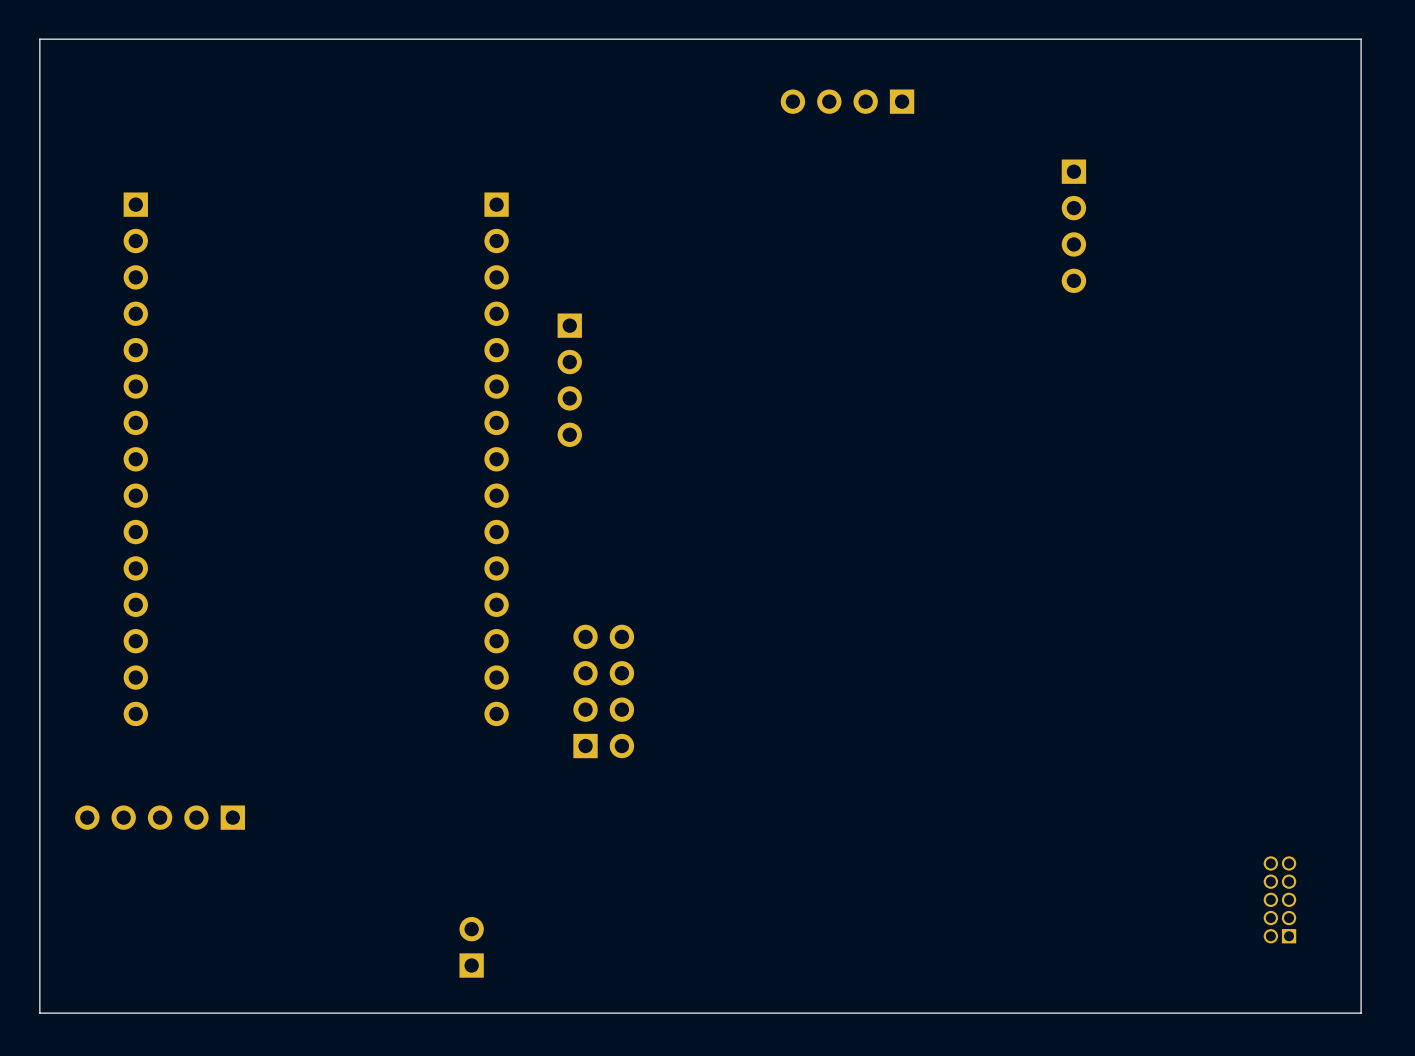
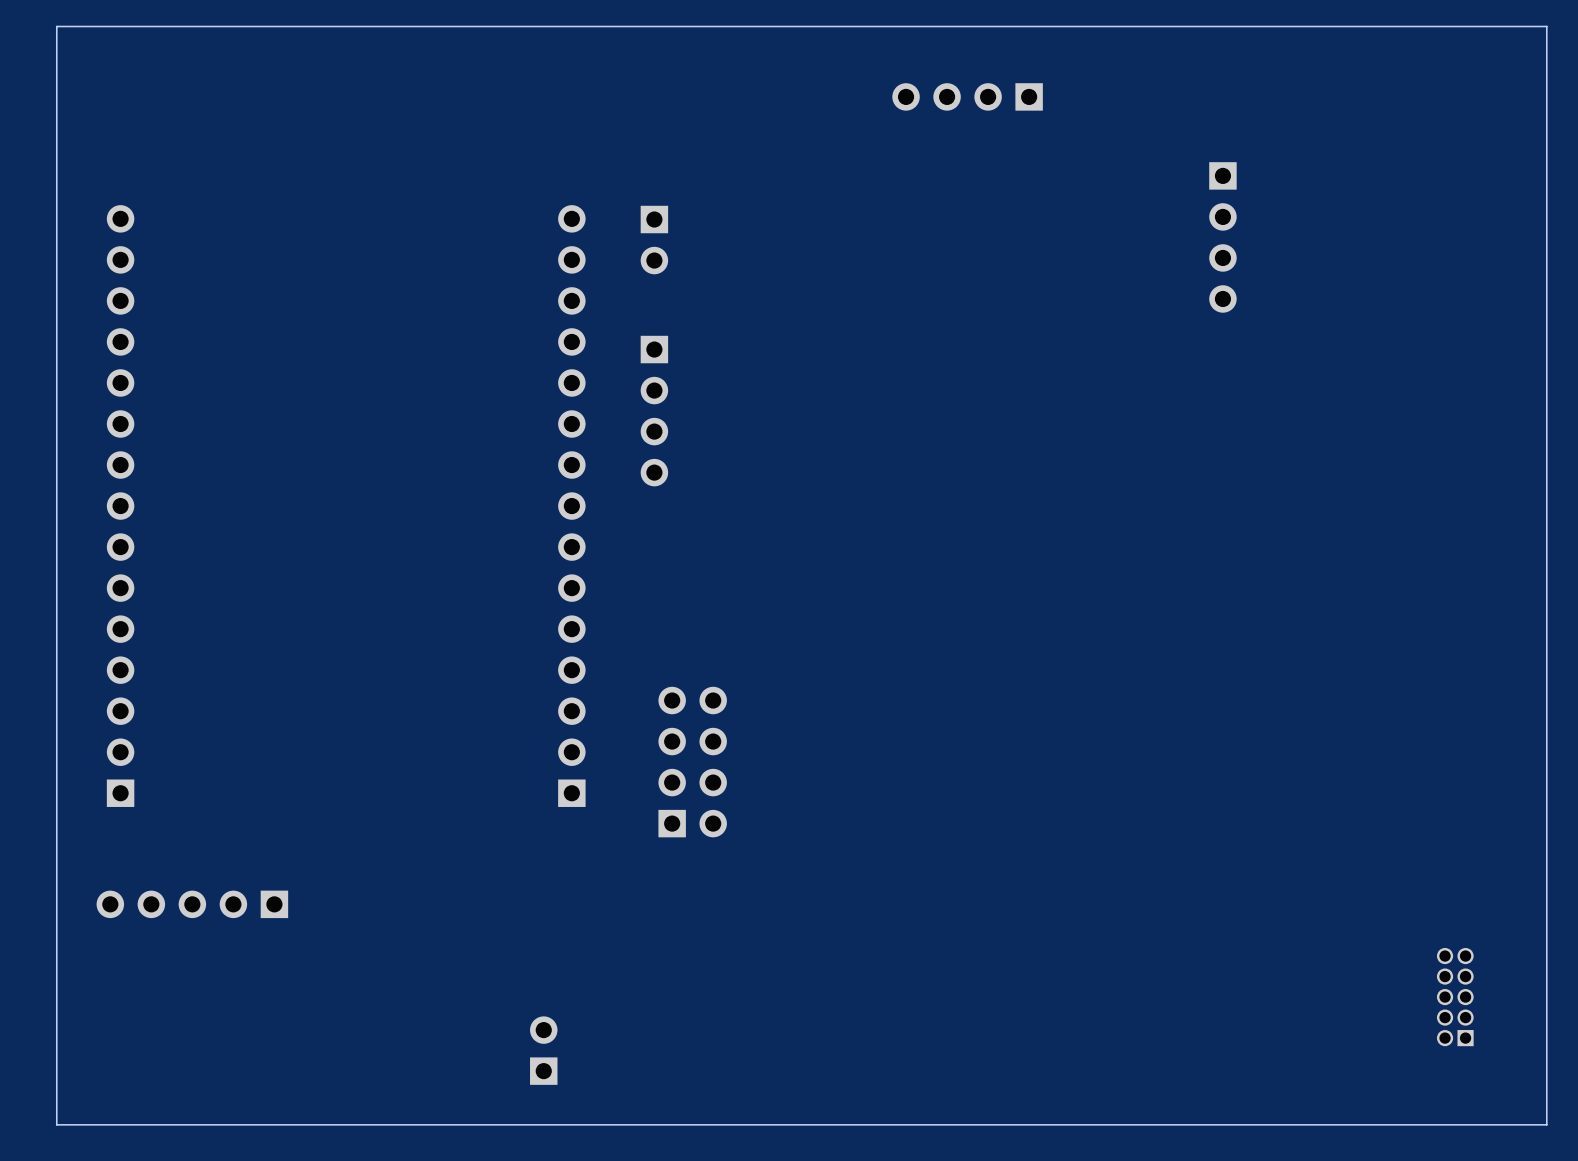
part: none -> (654, 240)
part rotation: 0° (135, 459) -> 180° (120, 506)
part rotation: 0° (496, 459) -> 180° (571, 506)

